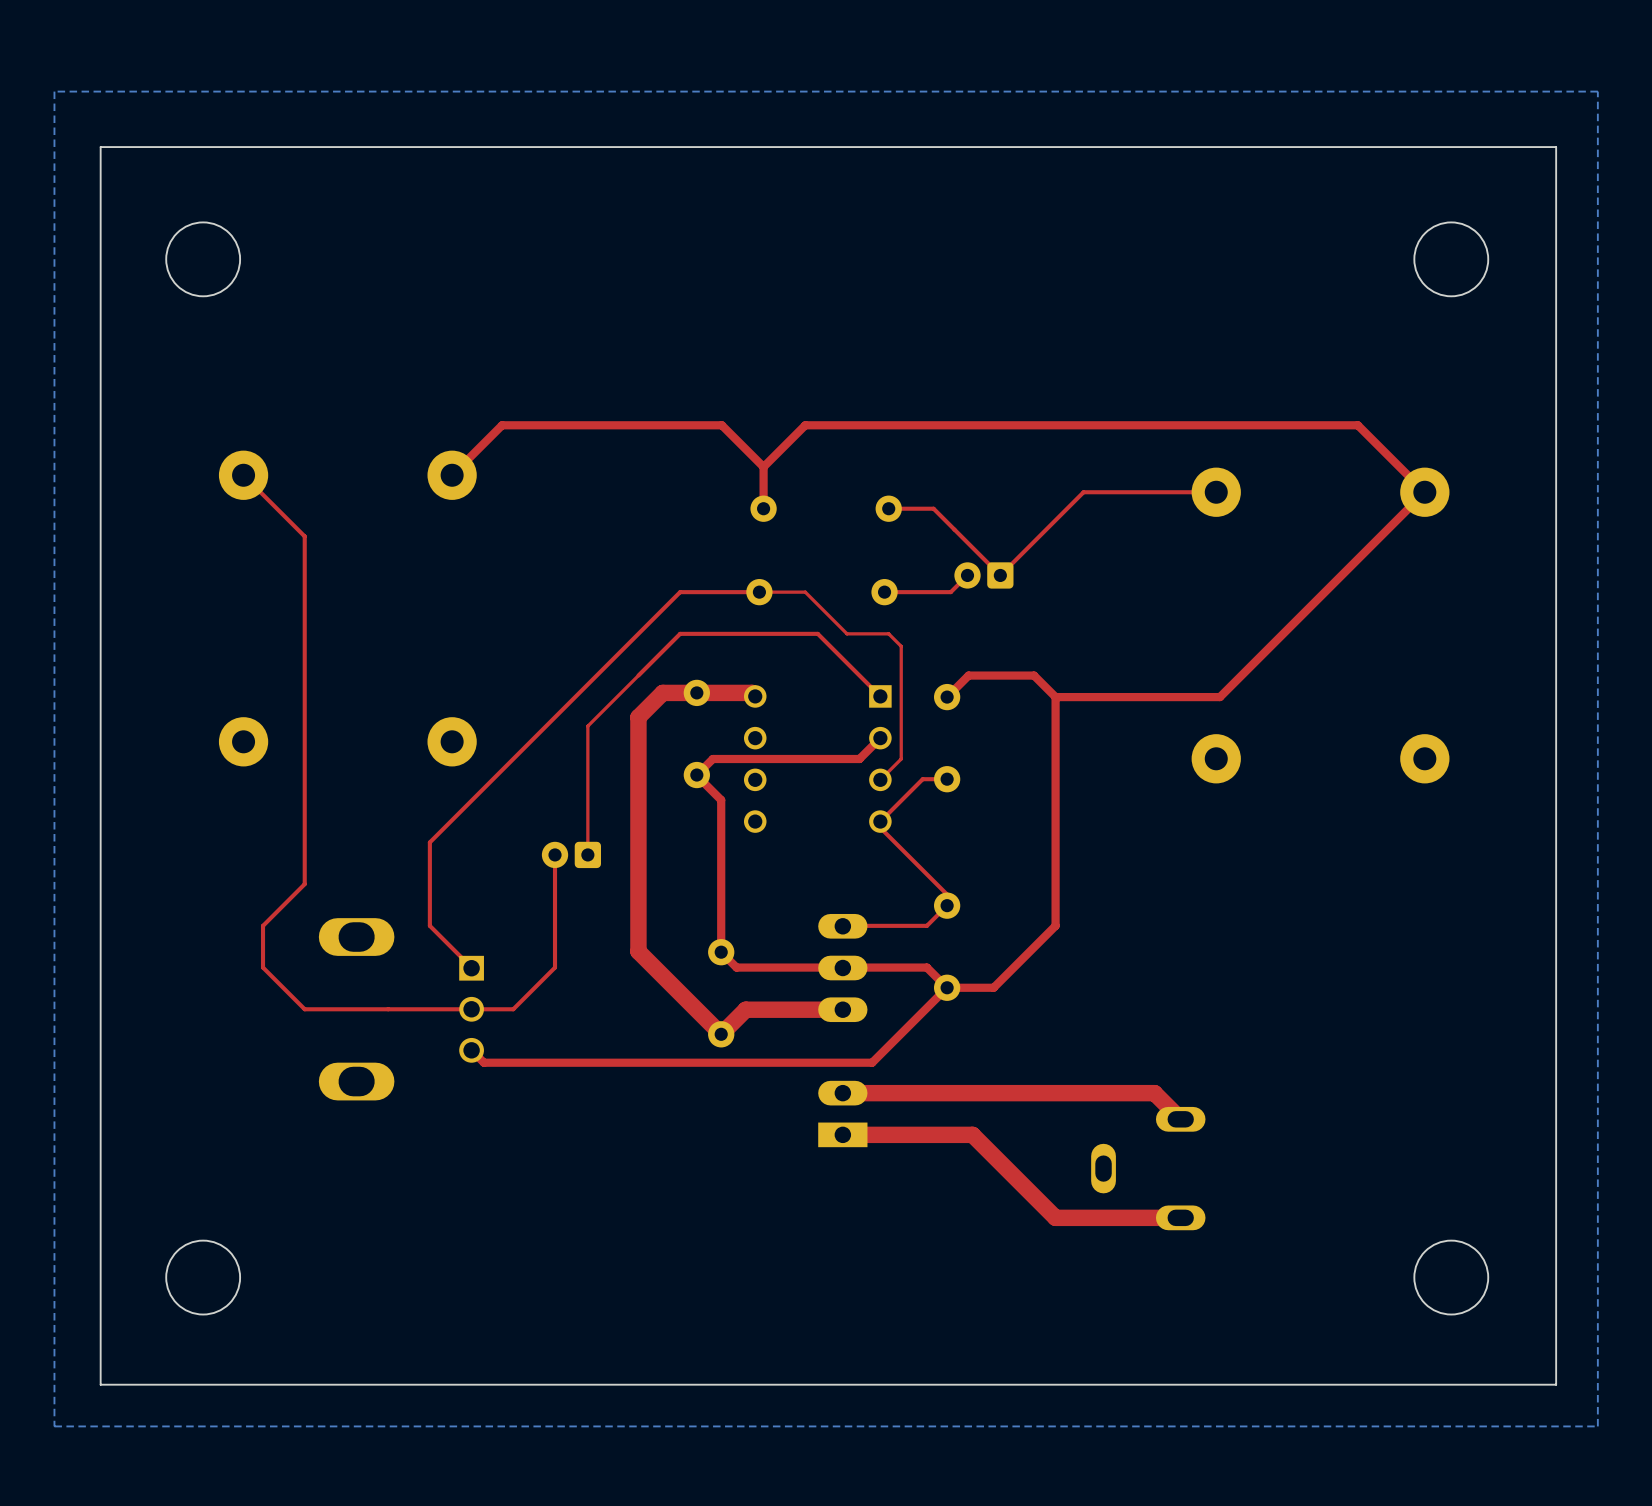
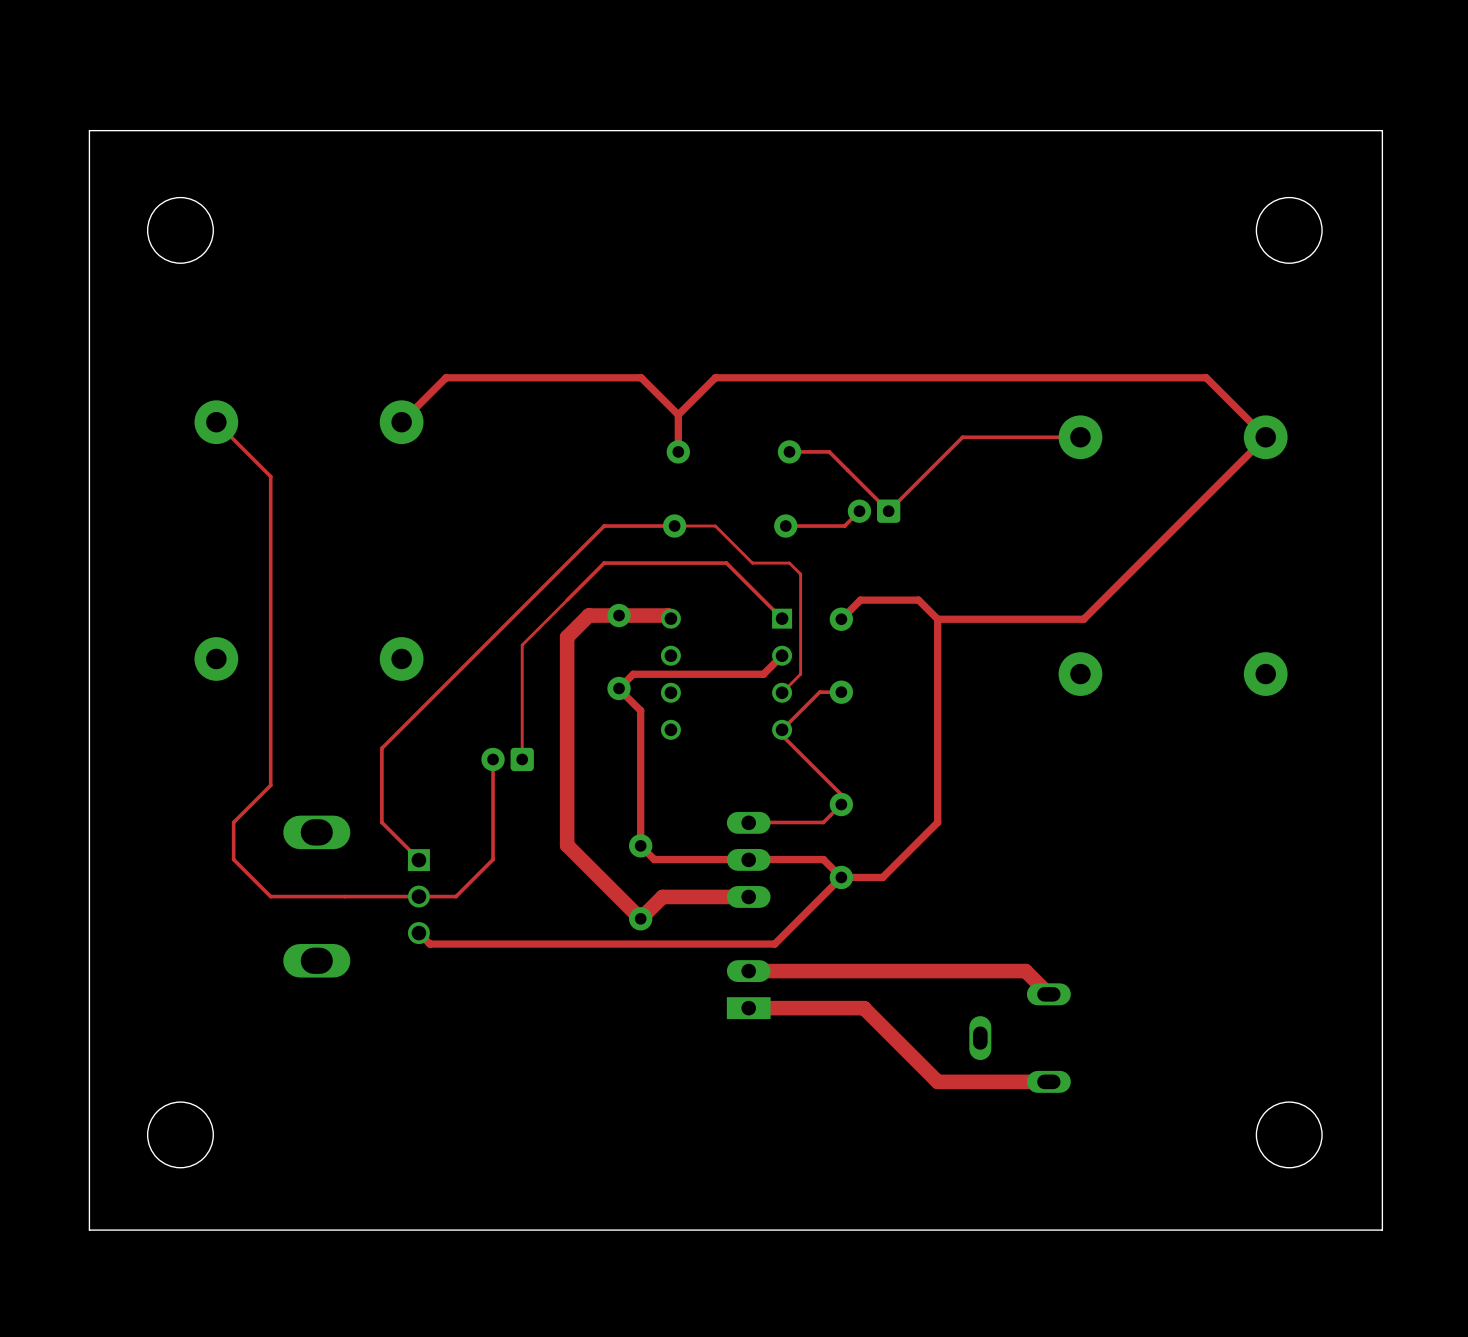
bottom zone outline: (1597, 91) (1597, 1426) (54, 1426) (54, 91) (1597, 91) -> none

